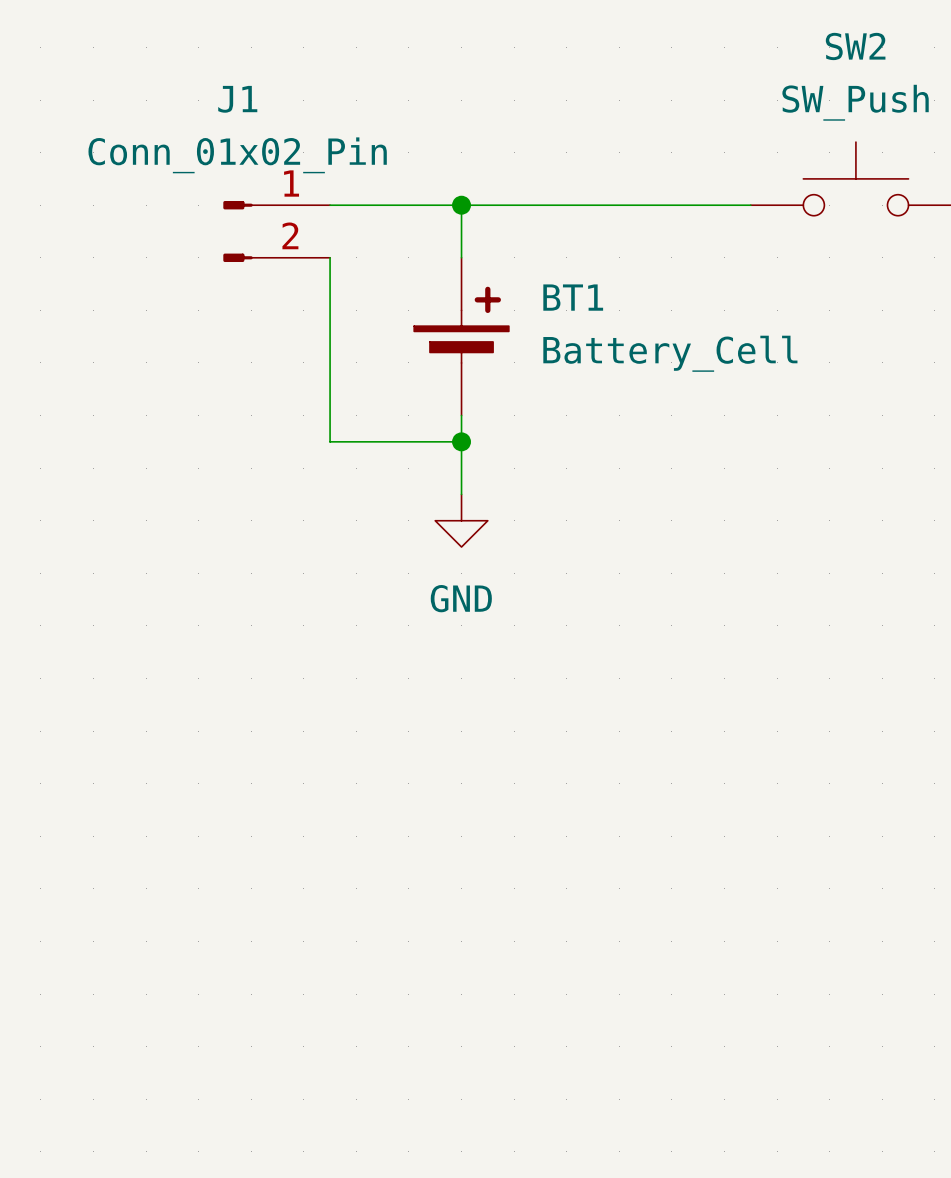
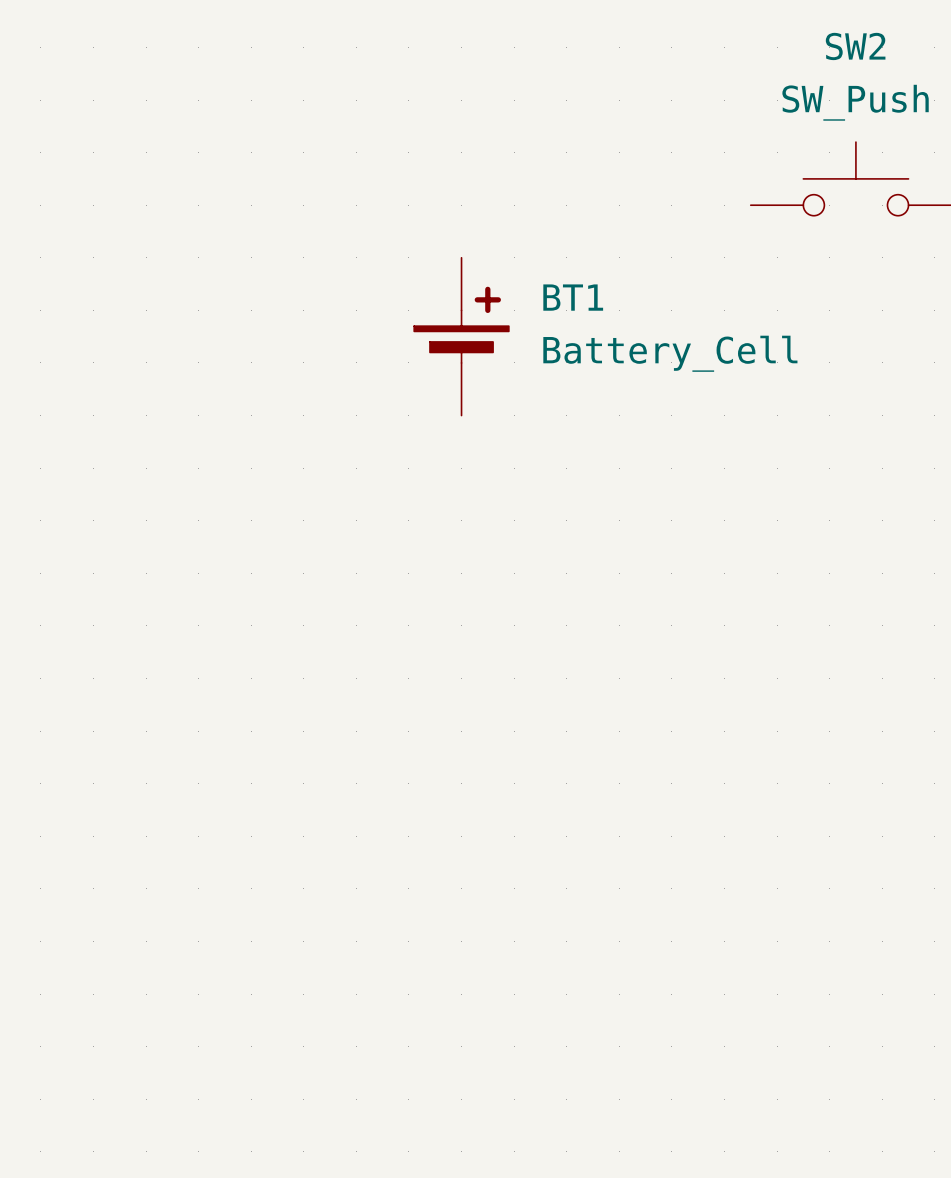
wire: (330, 205) (750, 205) -> none
wire: (461, 205) (461, 257) -> none
junction: (461, 205) -> none
J1: Conn_01x02_Pin (276, 231) -> none
wire: (330, 257) (330, 441) (461, 441) -> none
wire: (461, 415) (461, 494) -> none
junction: (461, 441) -> none
power symbol: GND (461, 520) -> none

